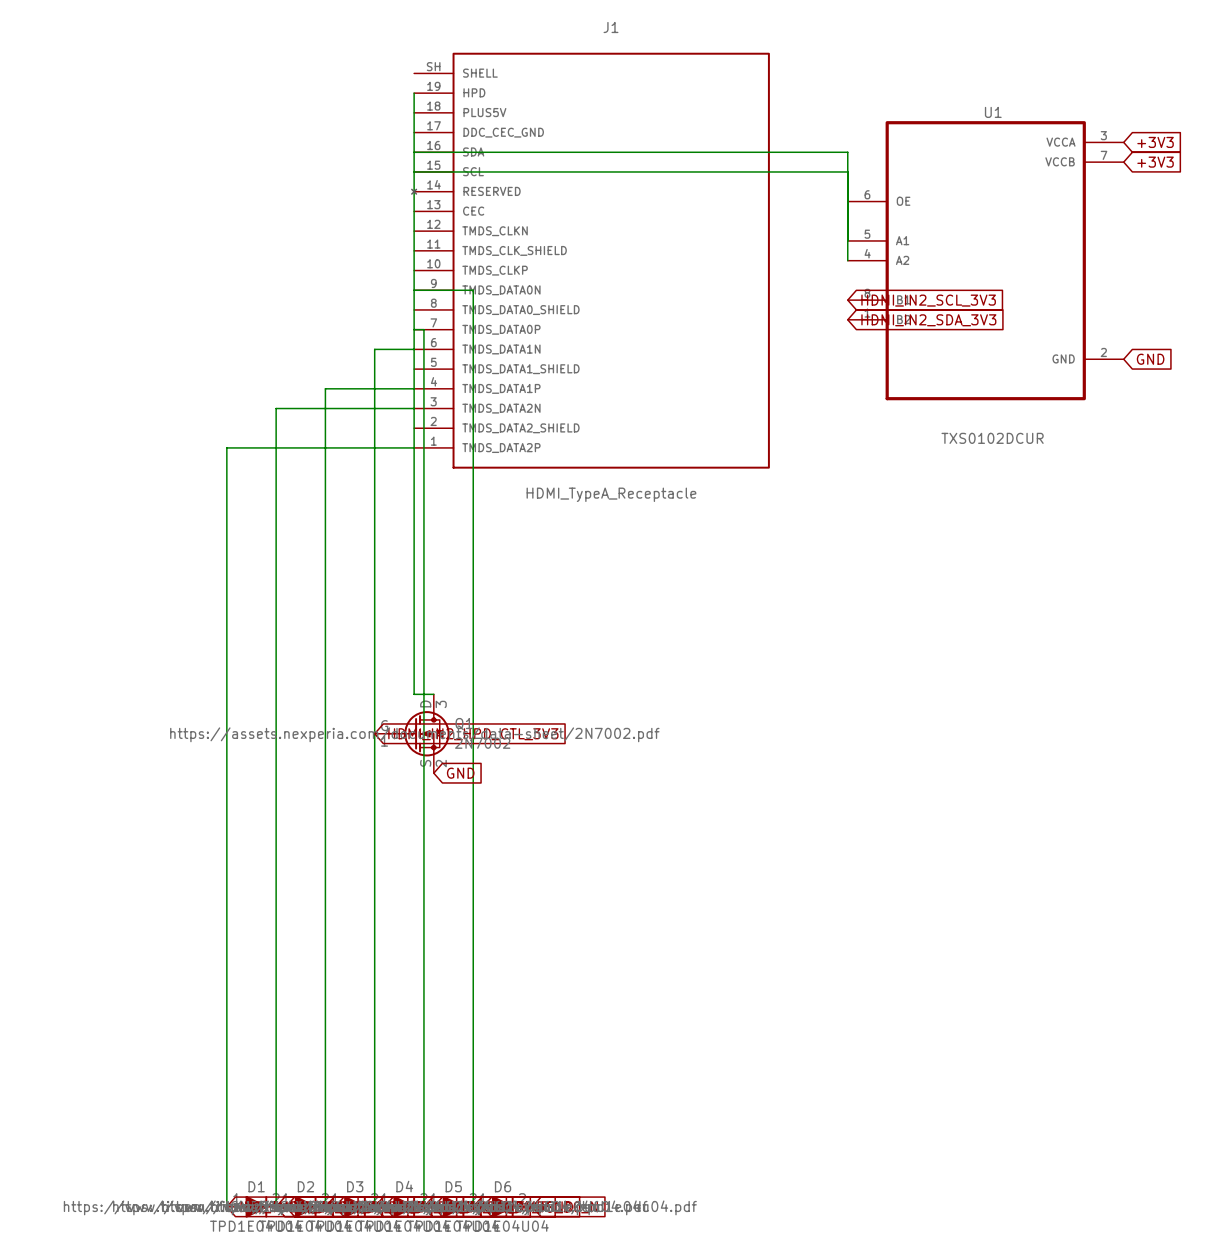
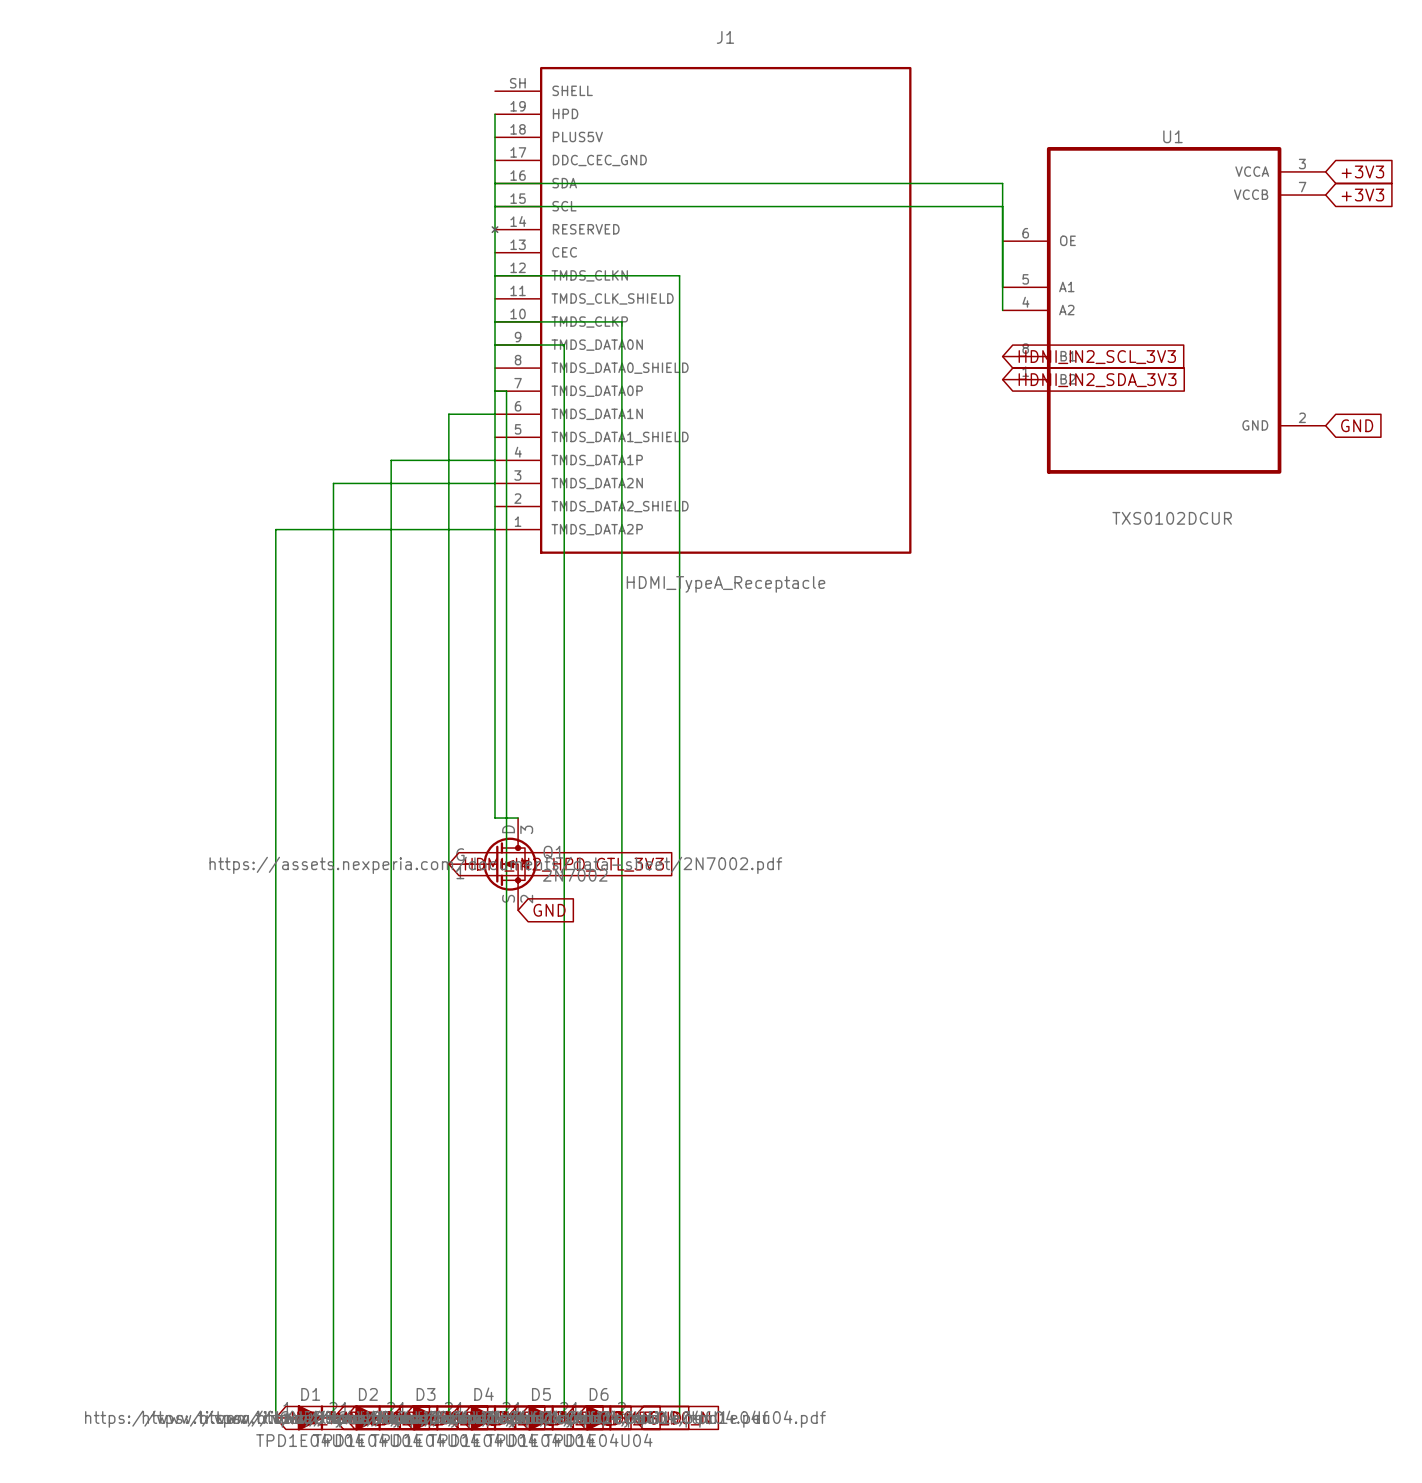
wire: none -> (495, 275) (679, 275) (679, 1417)
wire: none -> (495, 321) (621, 321) (621, 1417)

